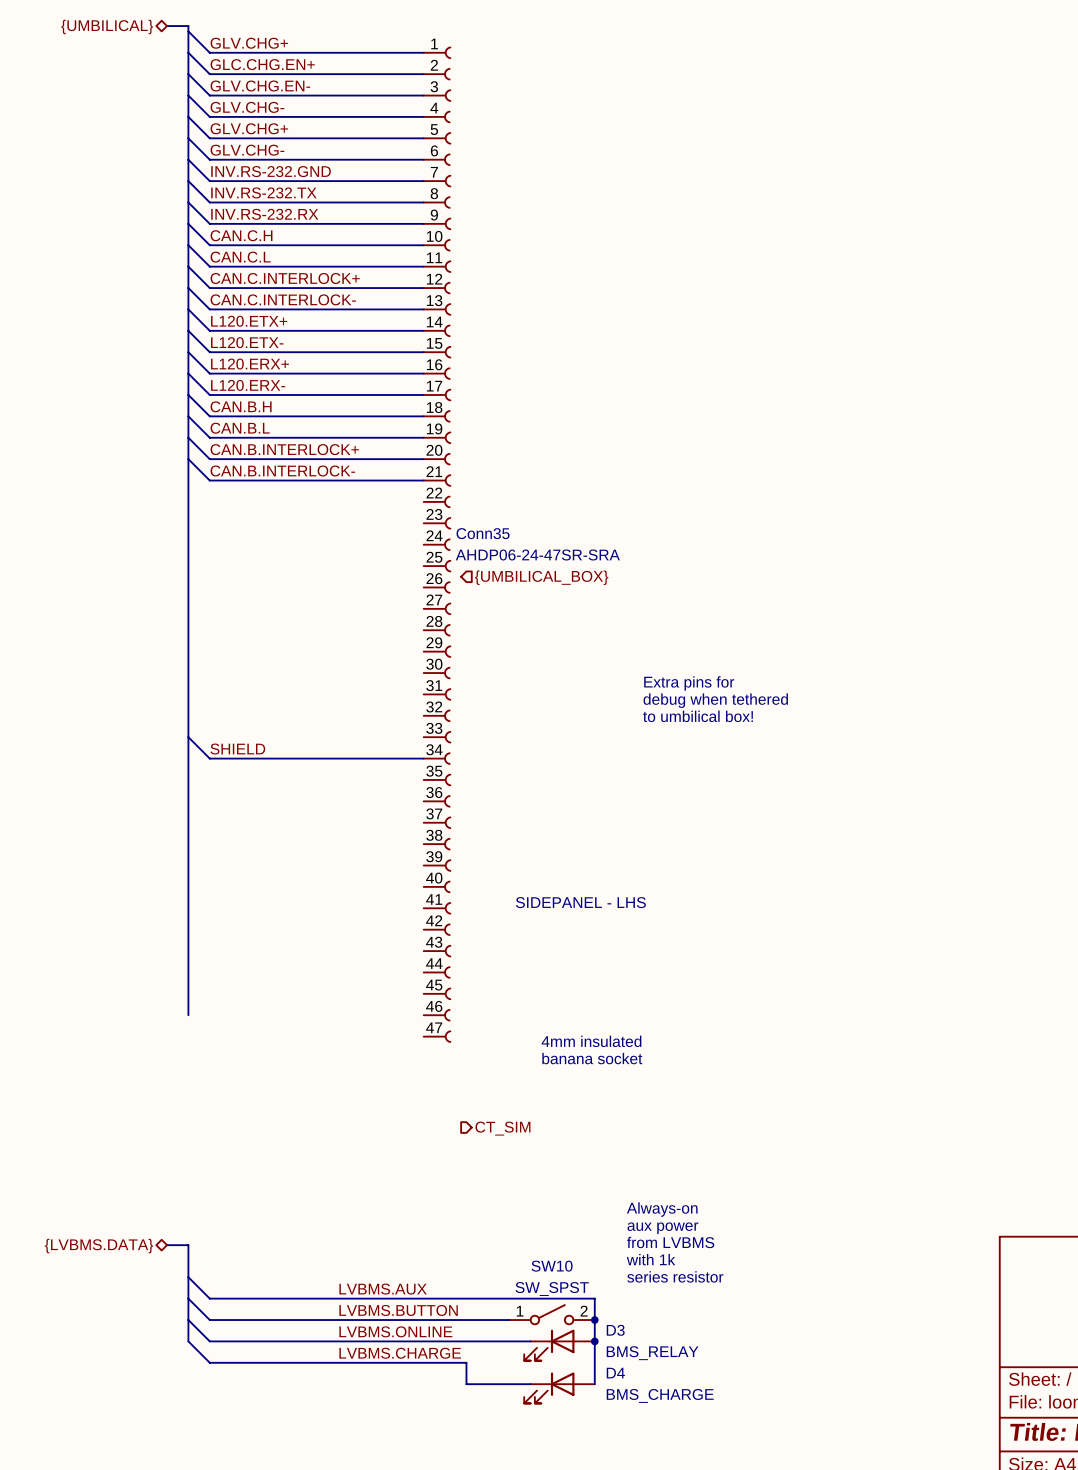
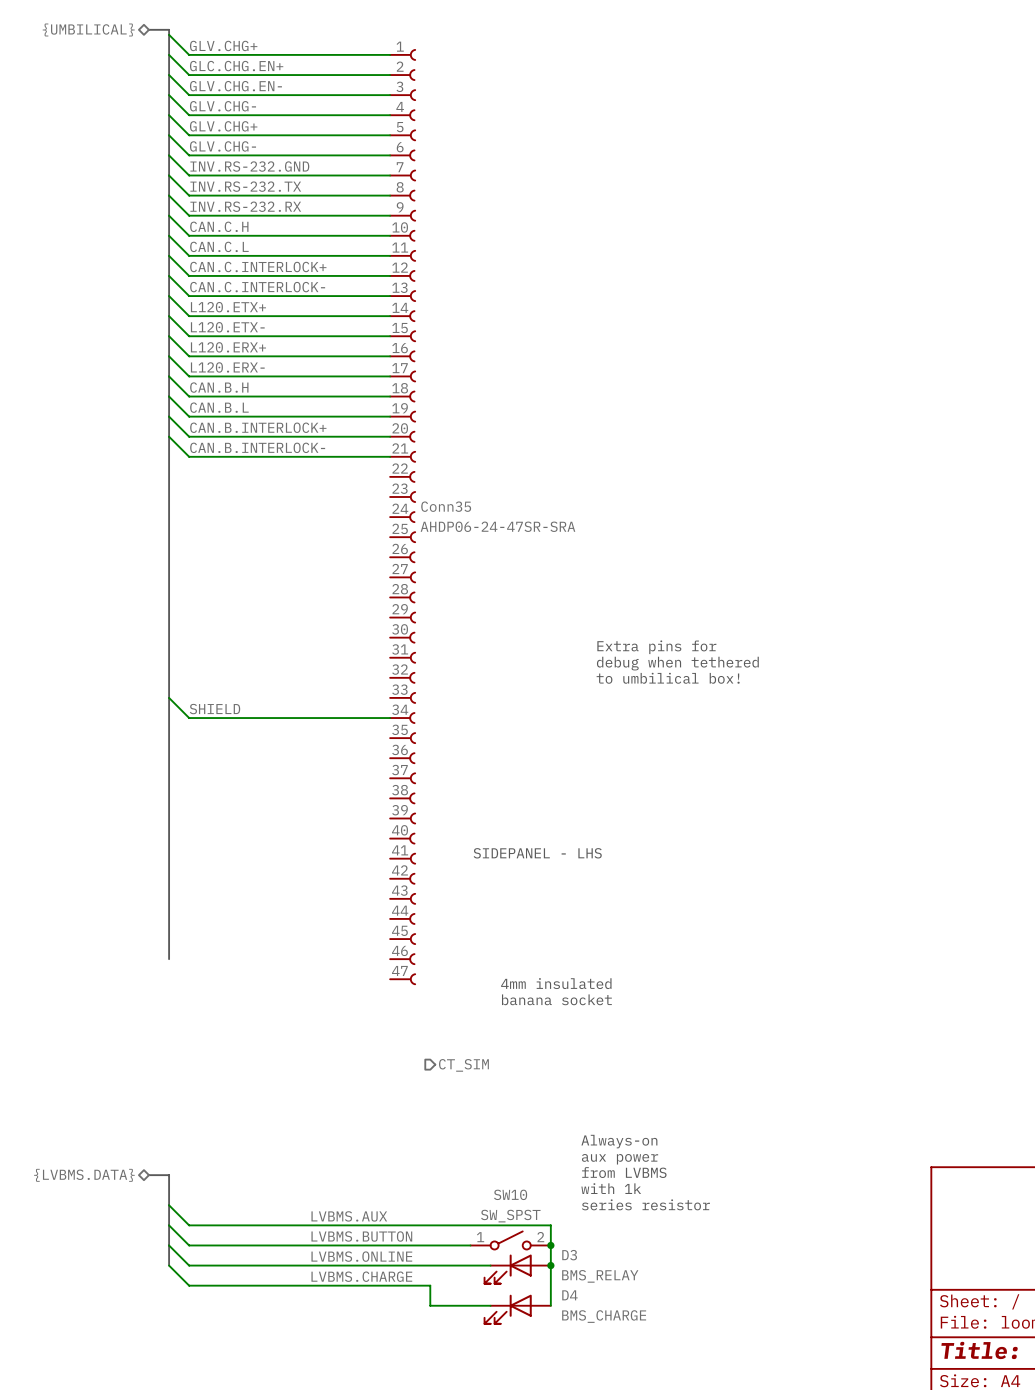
hierarchical label: {UMBILICAL_BOX} (541, 577) -> none

